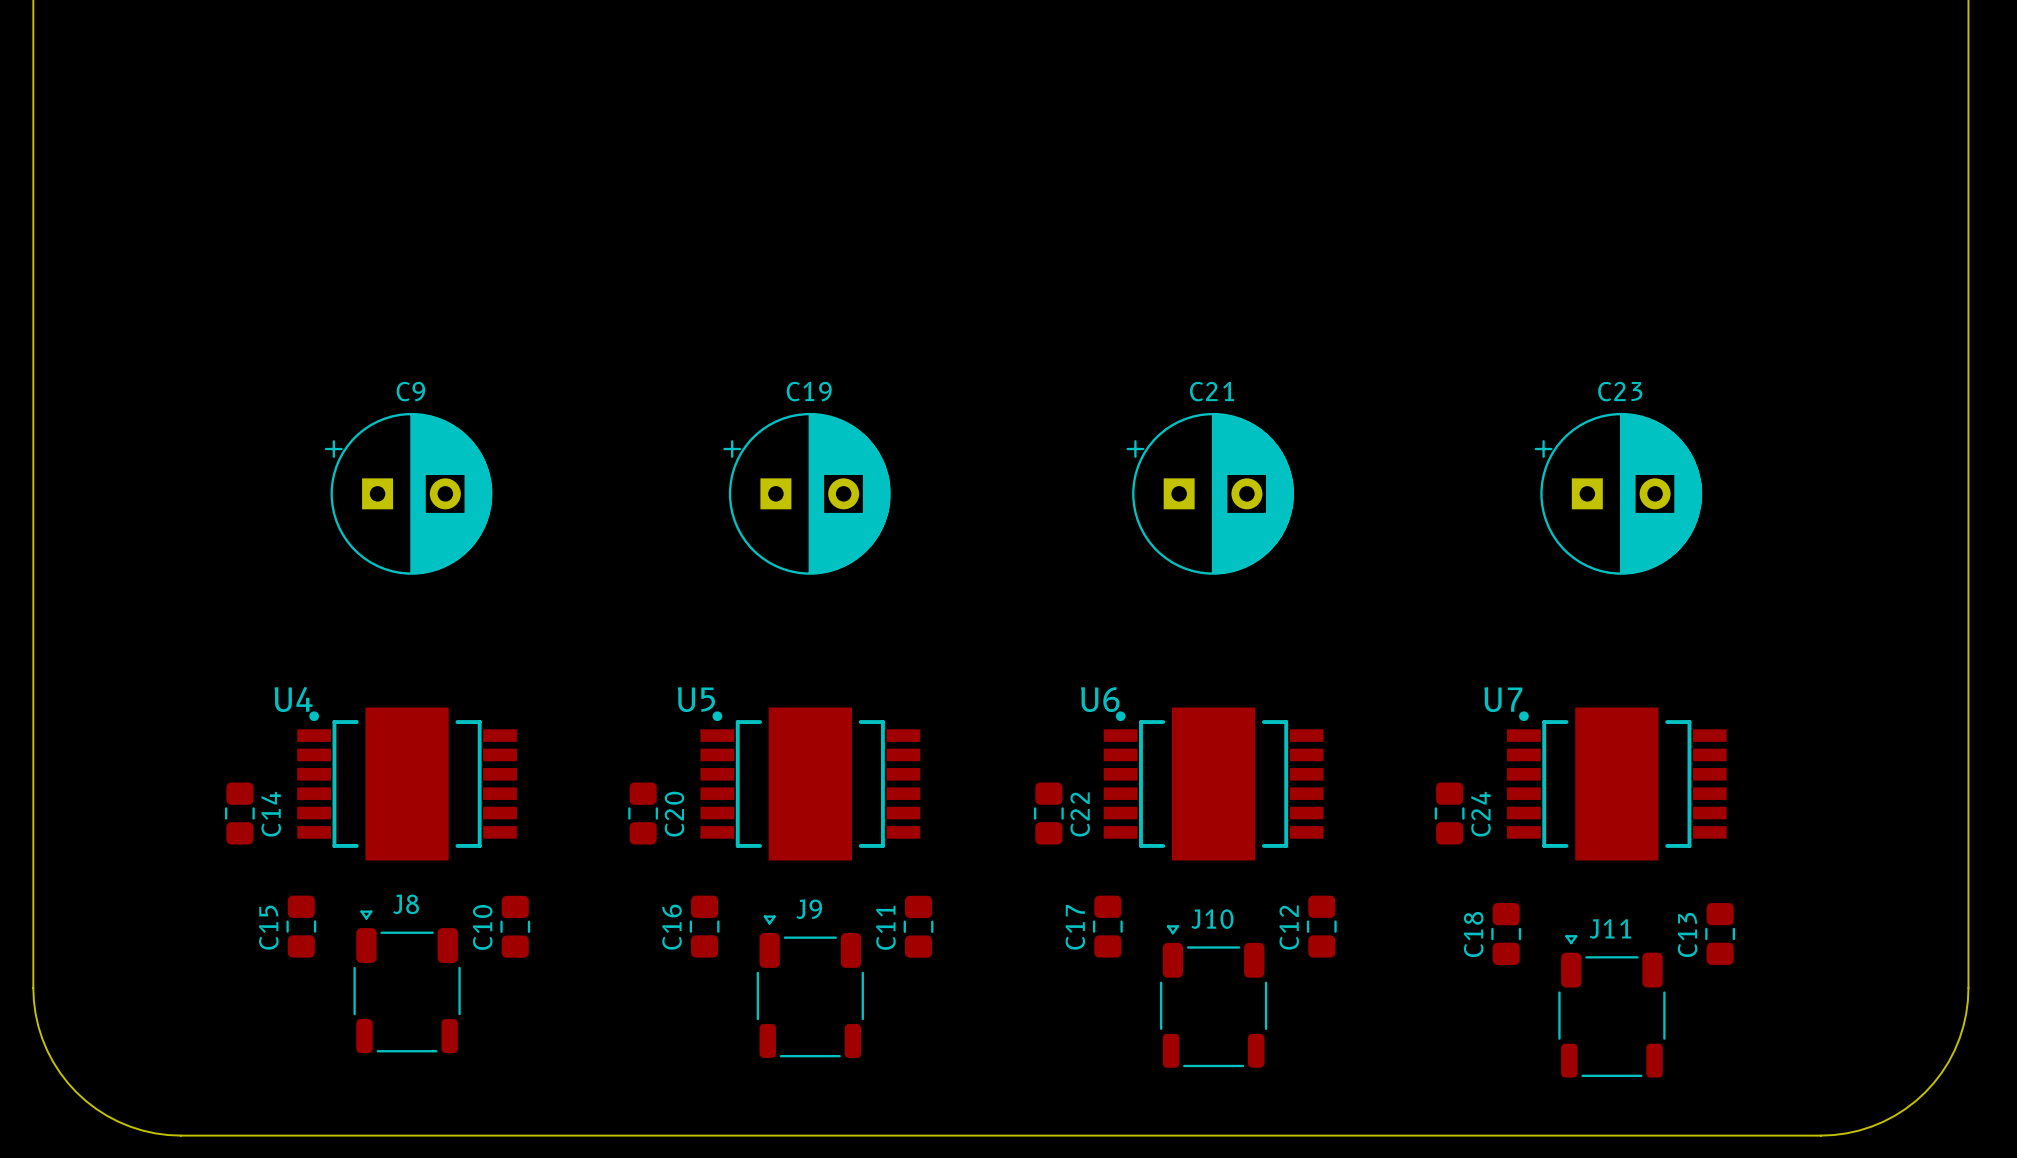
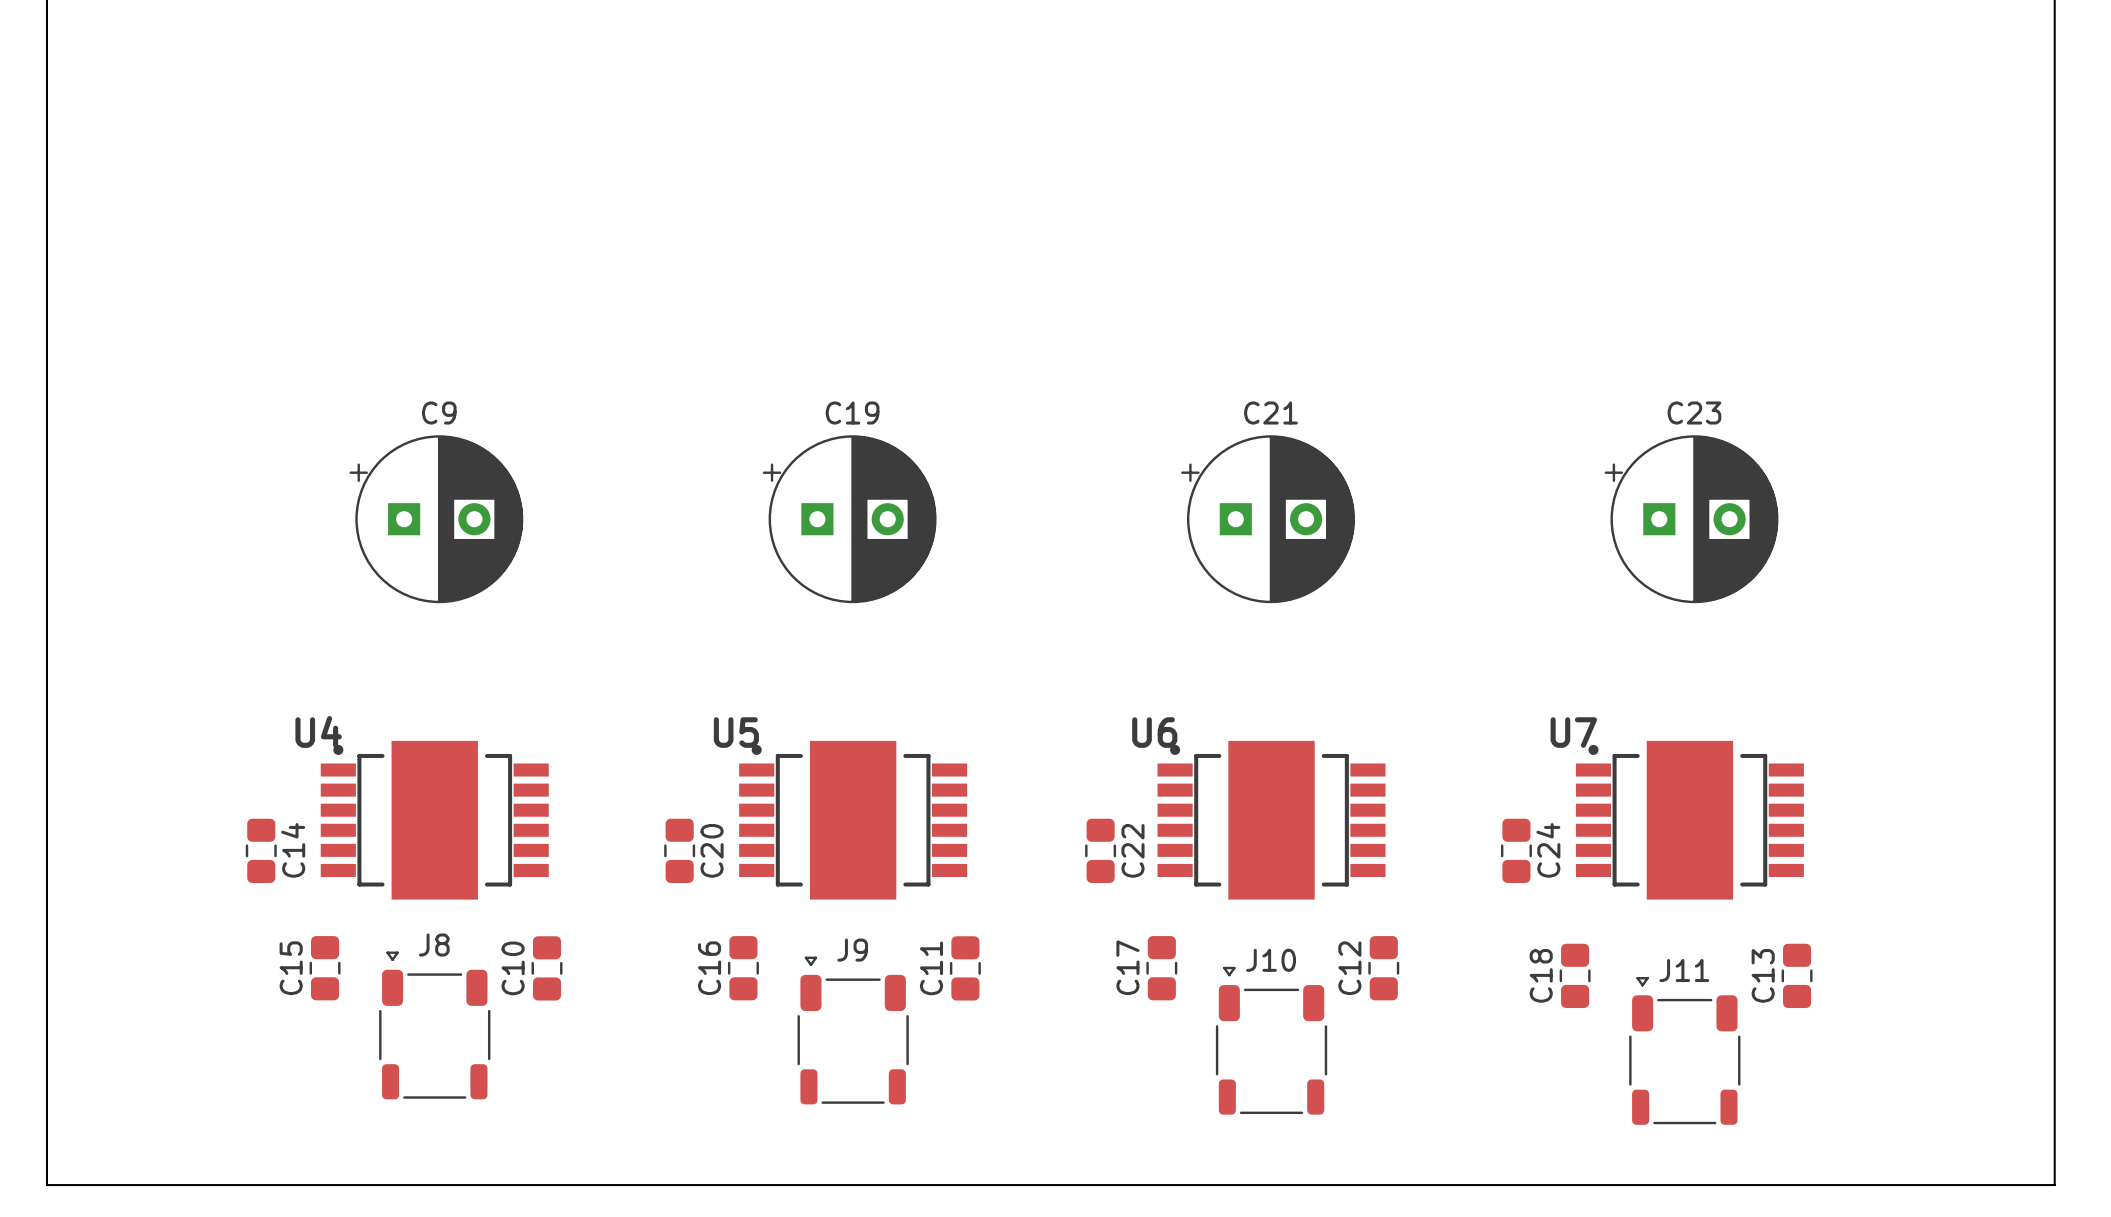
board edge: (33, 988) (38, 1026) (47, 1050) (60, 1072) (76, 1092) (96, 1108) (118, 1121) (142, 1130) (180, 1135) -> (46, 1031) (46, 1185) (200, 1185)
board edge: (1968, 988) (1963, 1026) (1954, 1050) (1941, 1072) (1925, 1092) (1905, 1108) (1883, 1121) (1859, 1130) (1820, 1135) -> (2054, 1031) (2054, 1185) (1901, 1185)

